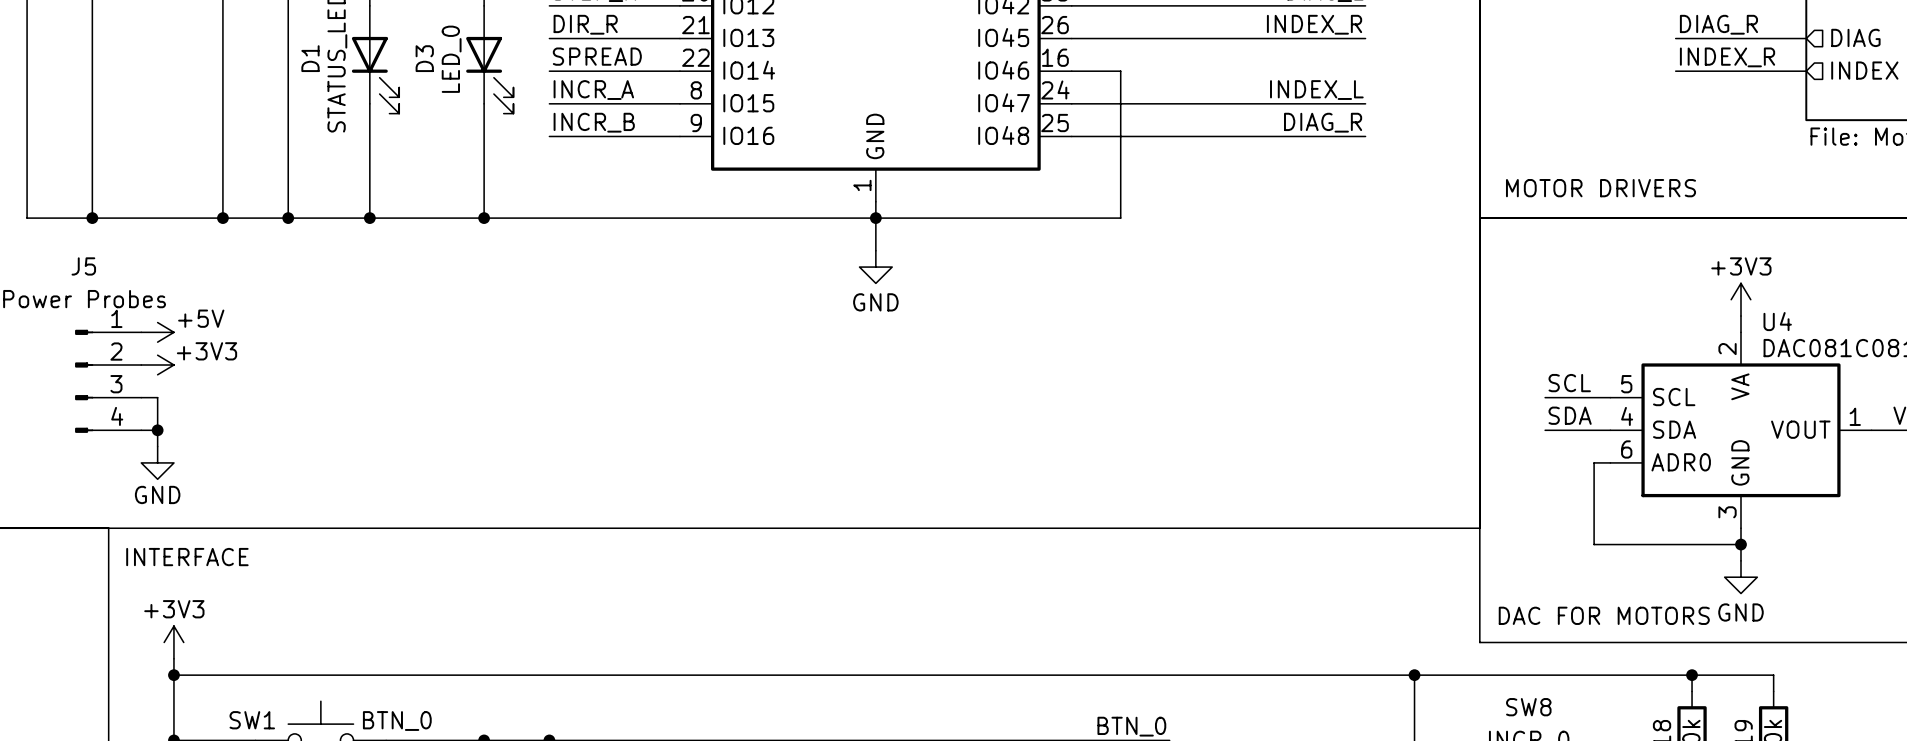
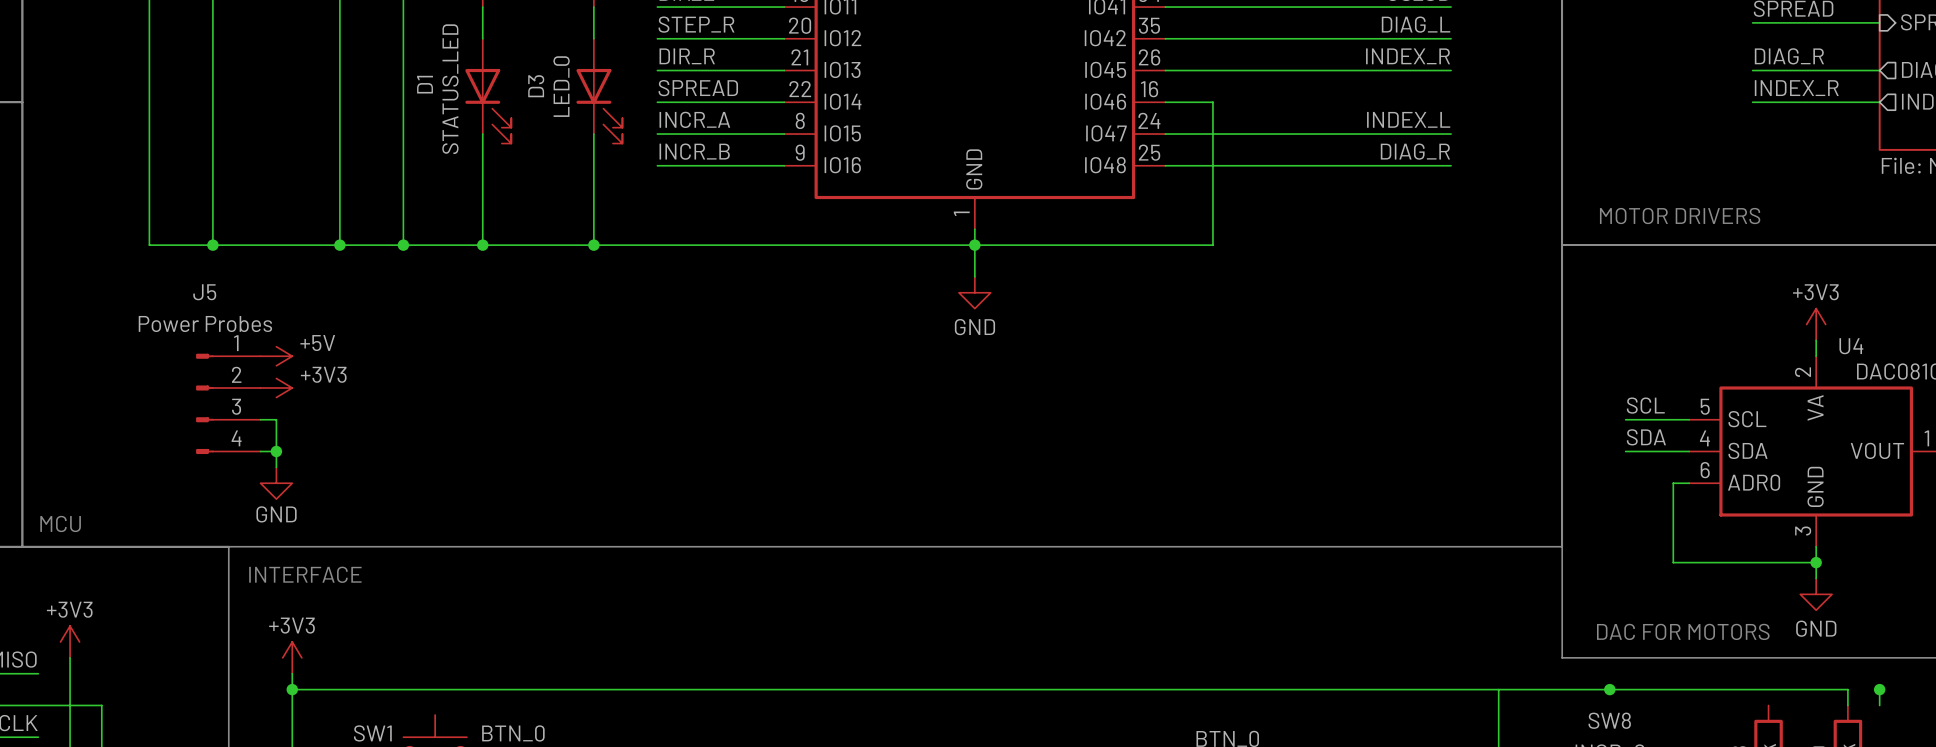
junction: (1414, 675) -> none
junction: none -> (1609, 689)
wire: (1692, 675) (1692, 691) -> (1879, 689) (1879, 705)
junction: (1692, 675) -> none
junction: none -> (1879, 689)

